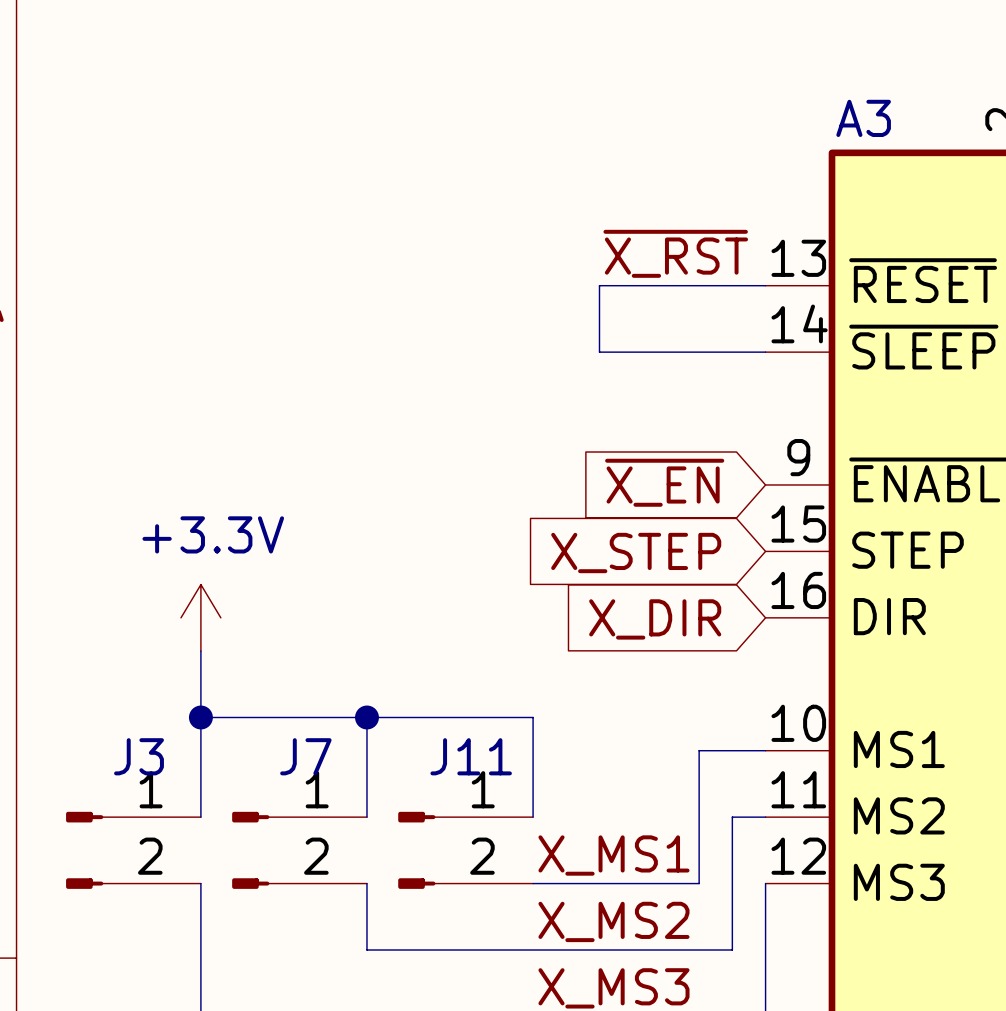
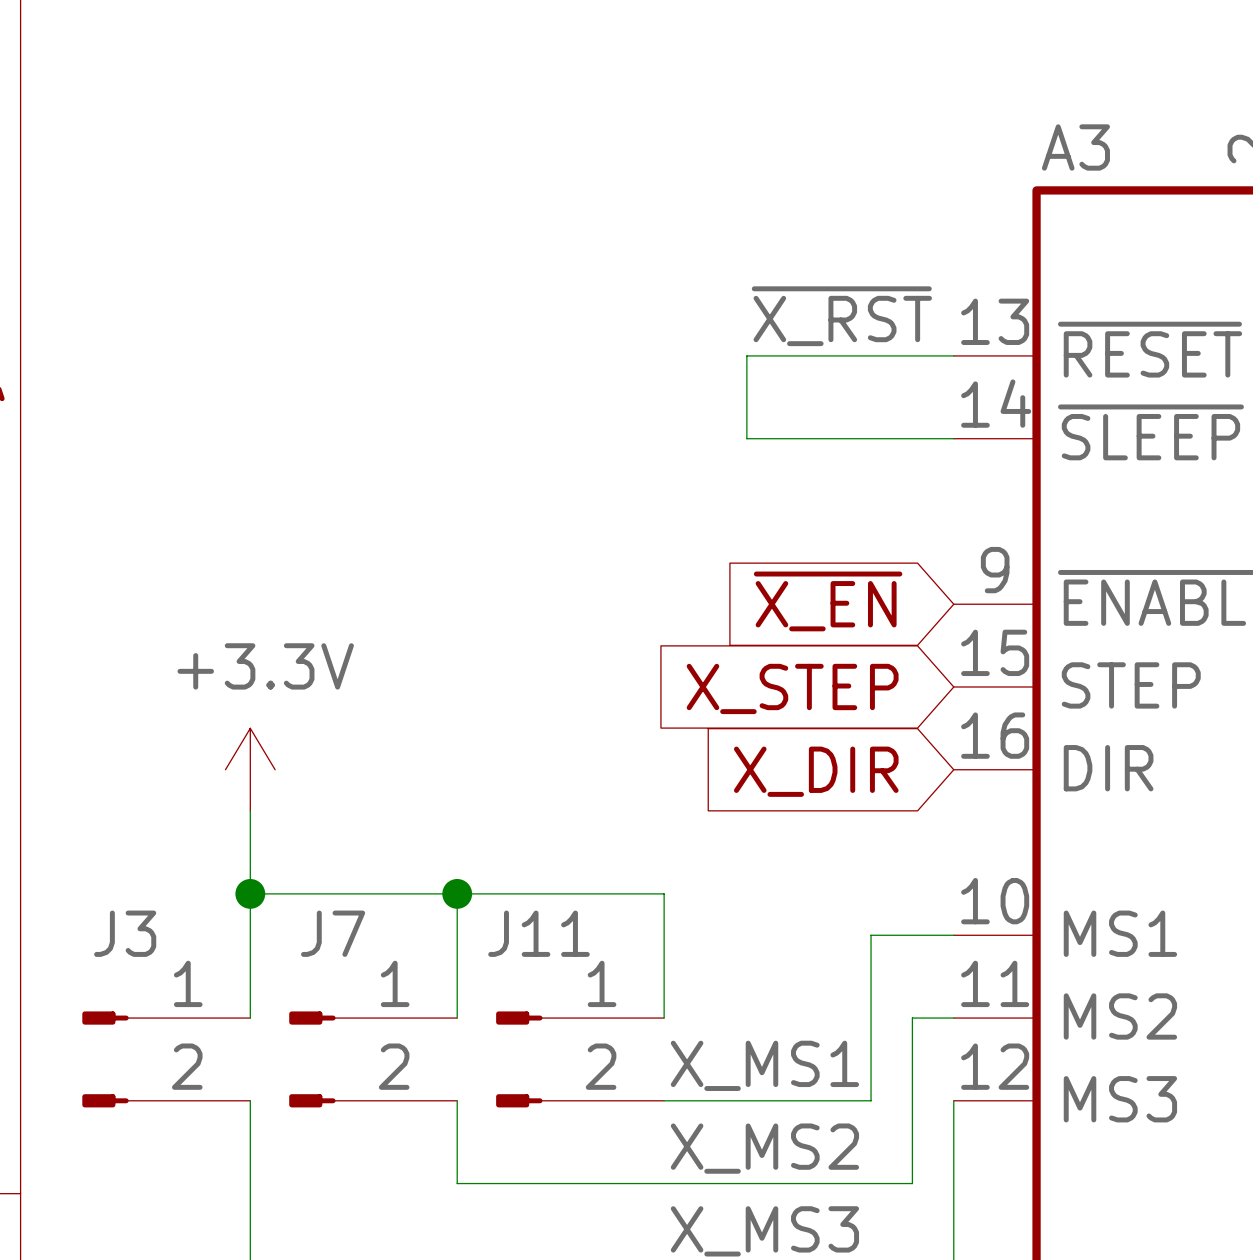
J3 name position: J3 (139, 756) -> J3 (125, 933)
J7 name position: J7 (305, 756) -> J7 (333, 933)
J11 name position: J11 (471, 756) -> J11 (538, 933)

